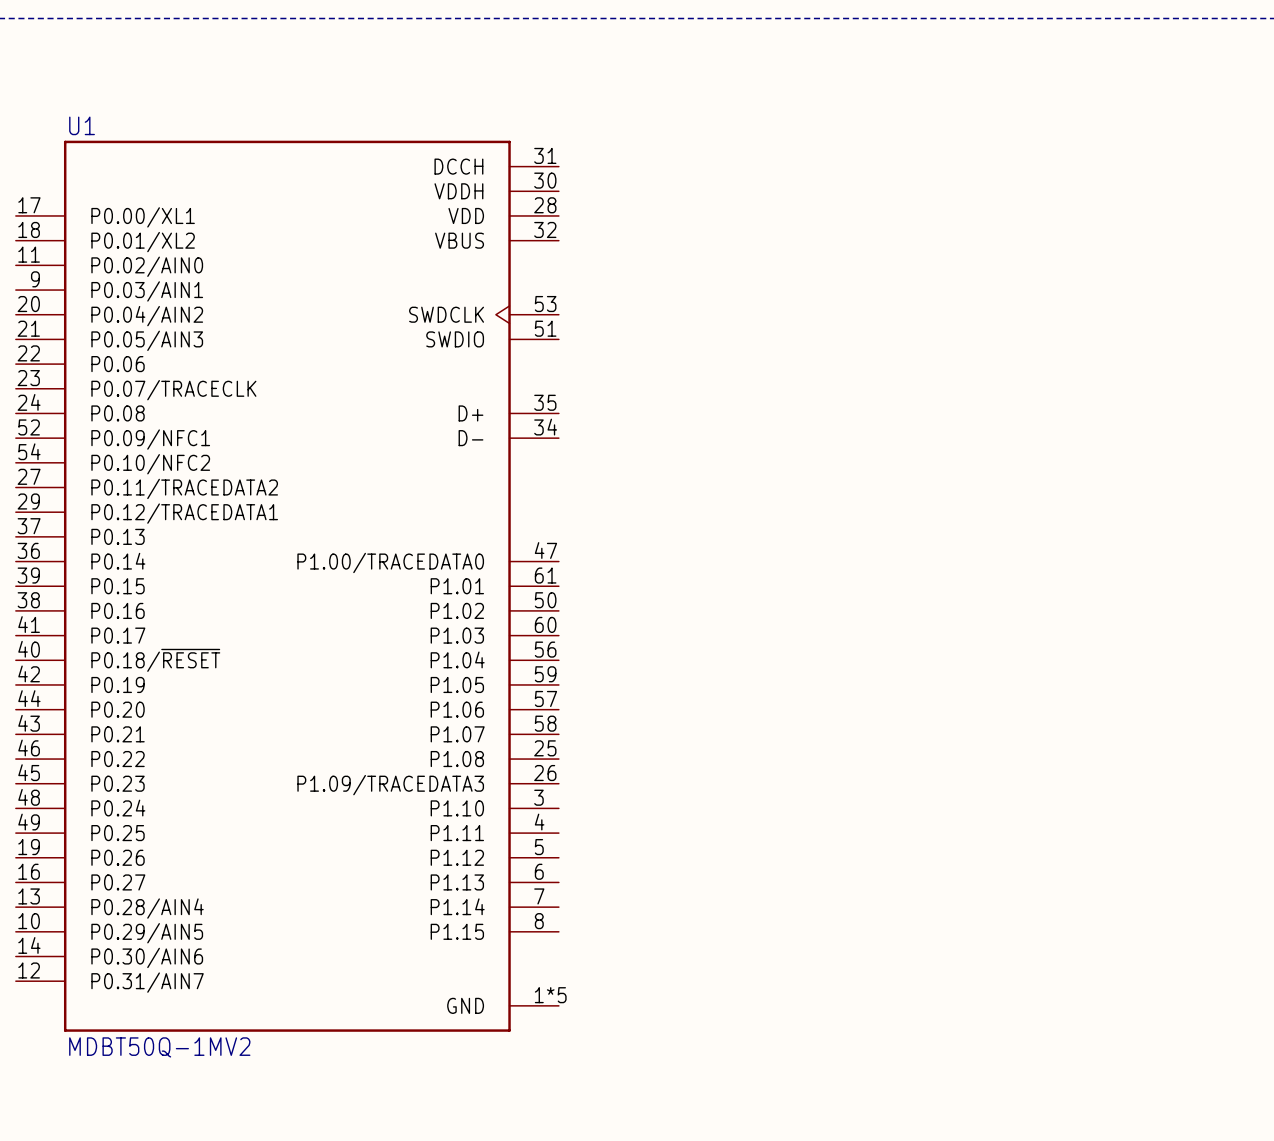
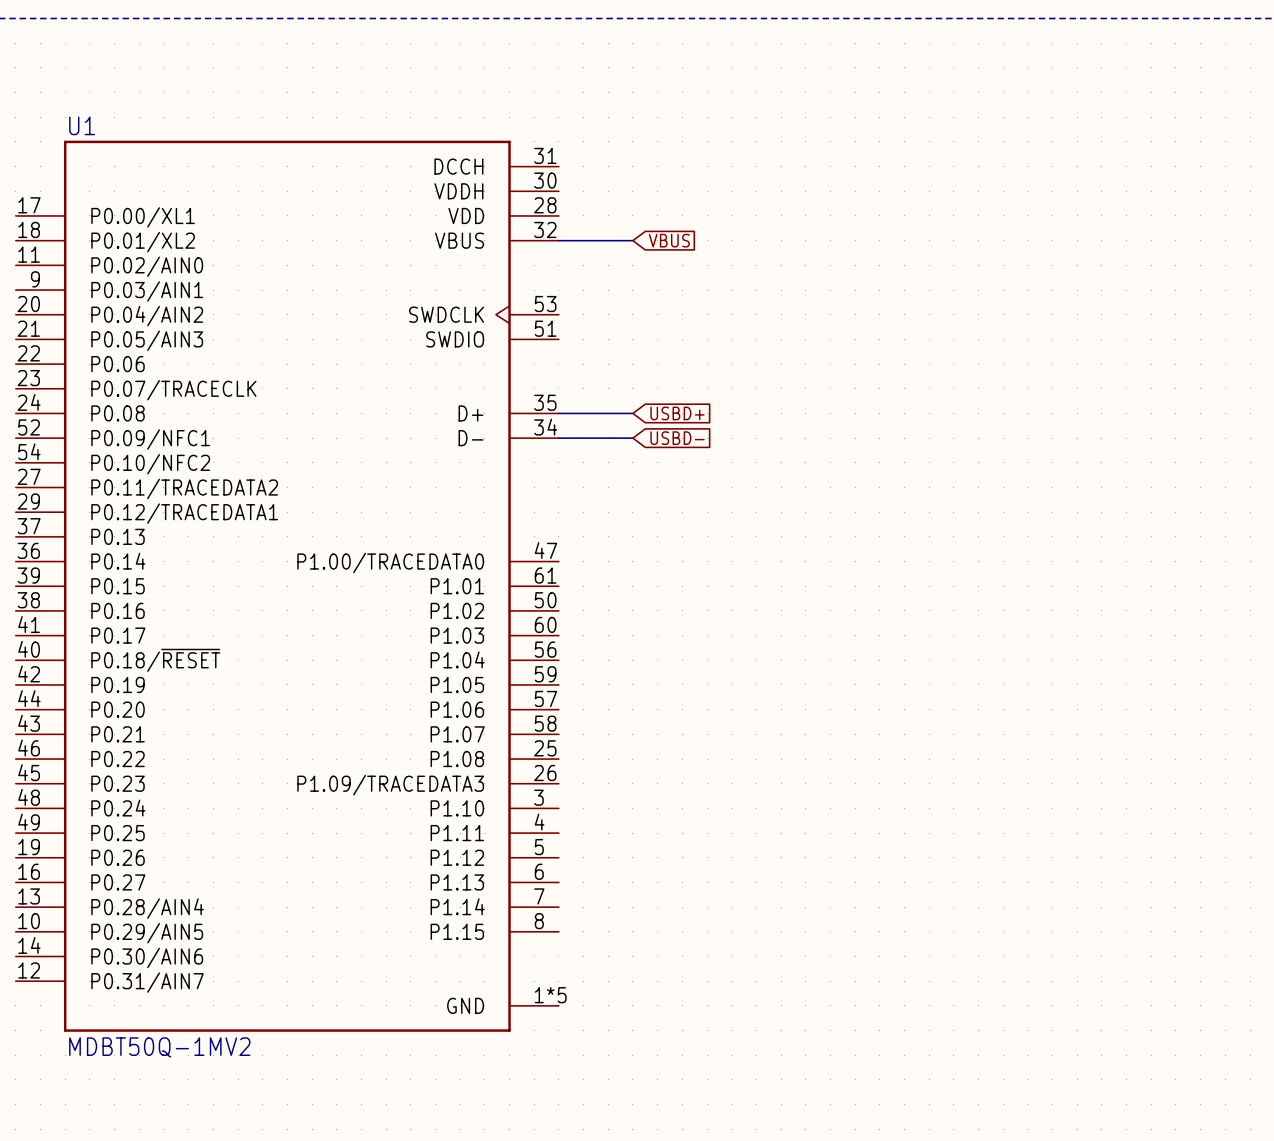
wire: none -> (558, 240) (632, 240)
global label: none -> VBUS (669, 240)
wire: none -> (558, 413) (632, 413)
global label: none -> USBD+ (677, 413)
wire: none -> (558, 438) (632, 438)
global label: none -> USBD- (677, 438)

